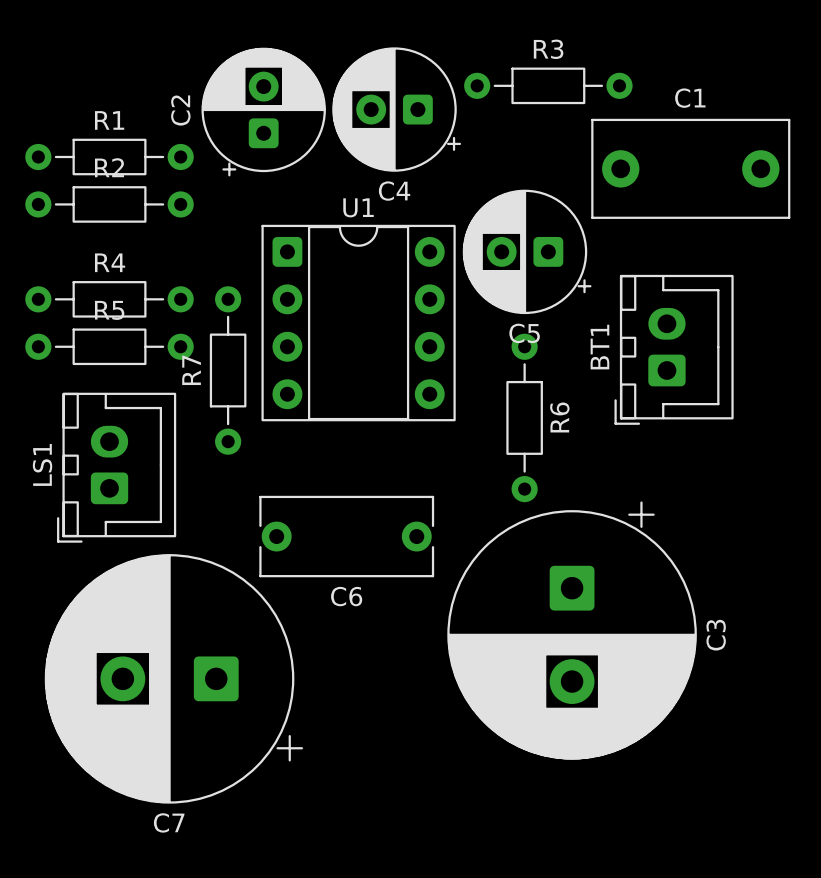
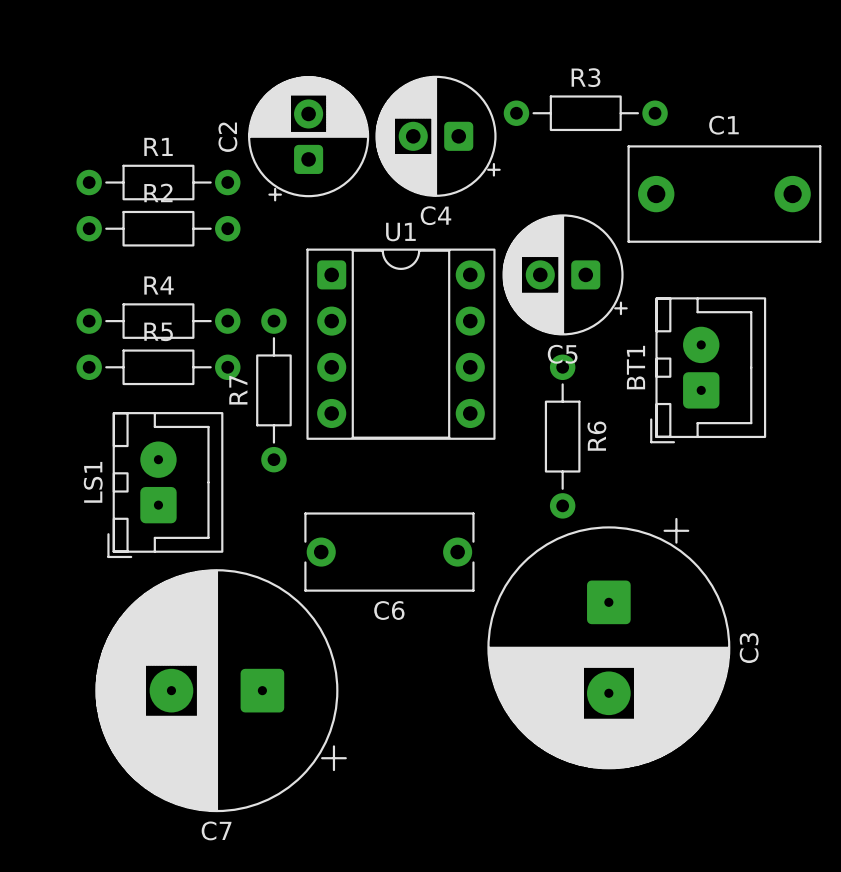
BT1 footprint: [614, 274, 734, 425] -> [650, 297, 767, 444]
LS1 footprint: [57, 392, 177, 543] -> [107, 412, 224, 559]
C3 footprint: [447, 501, 697, 760] -> [487, 517, 731, 770]
C7 footprint: [44, 554, 304, 804] -> [95, 569, 347, 813]

